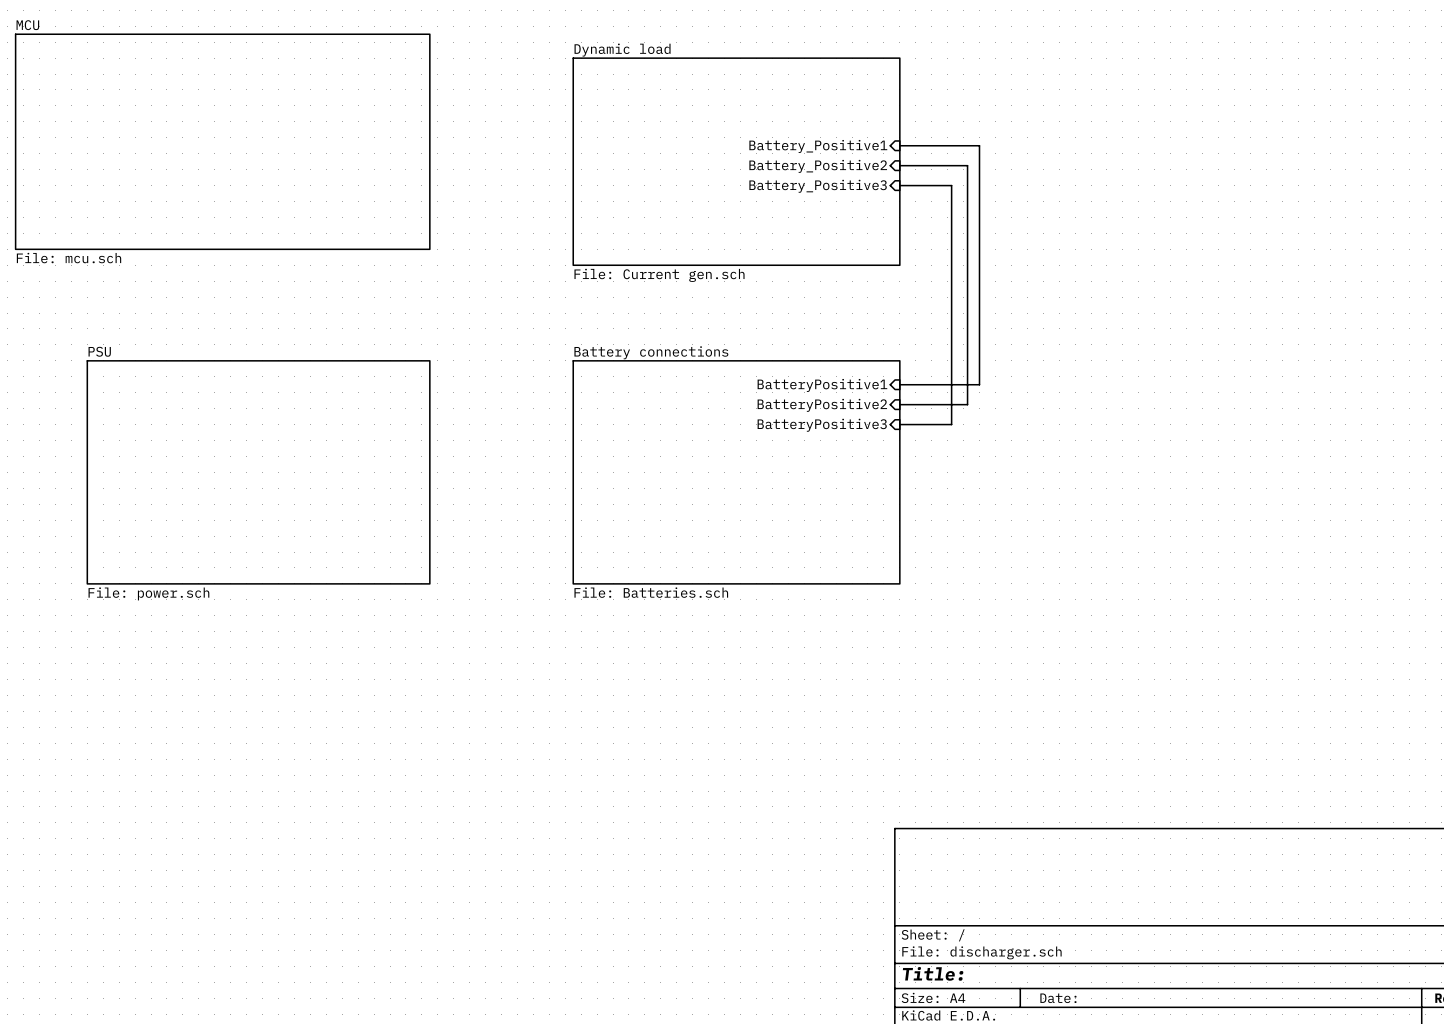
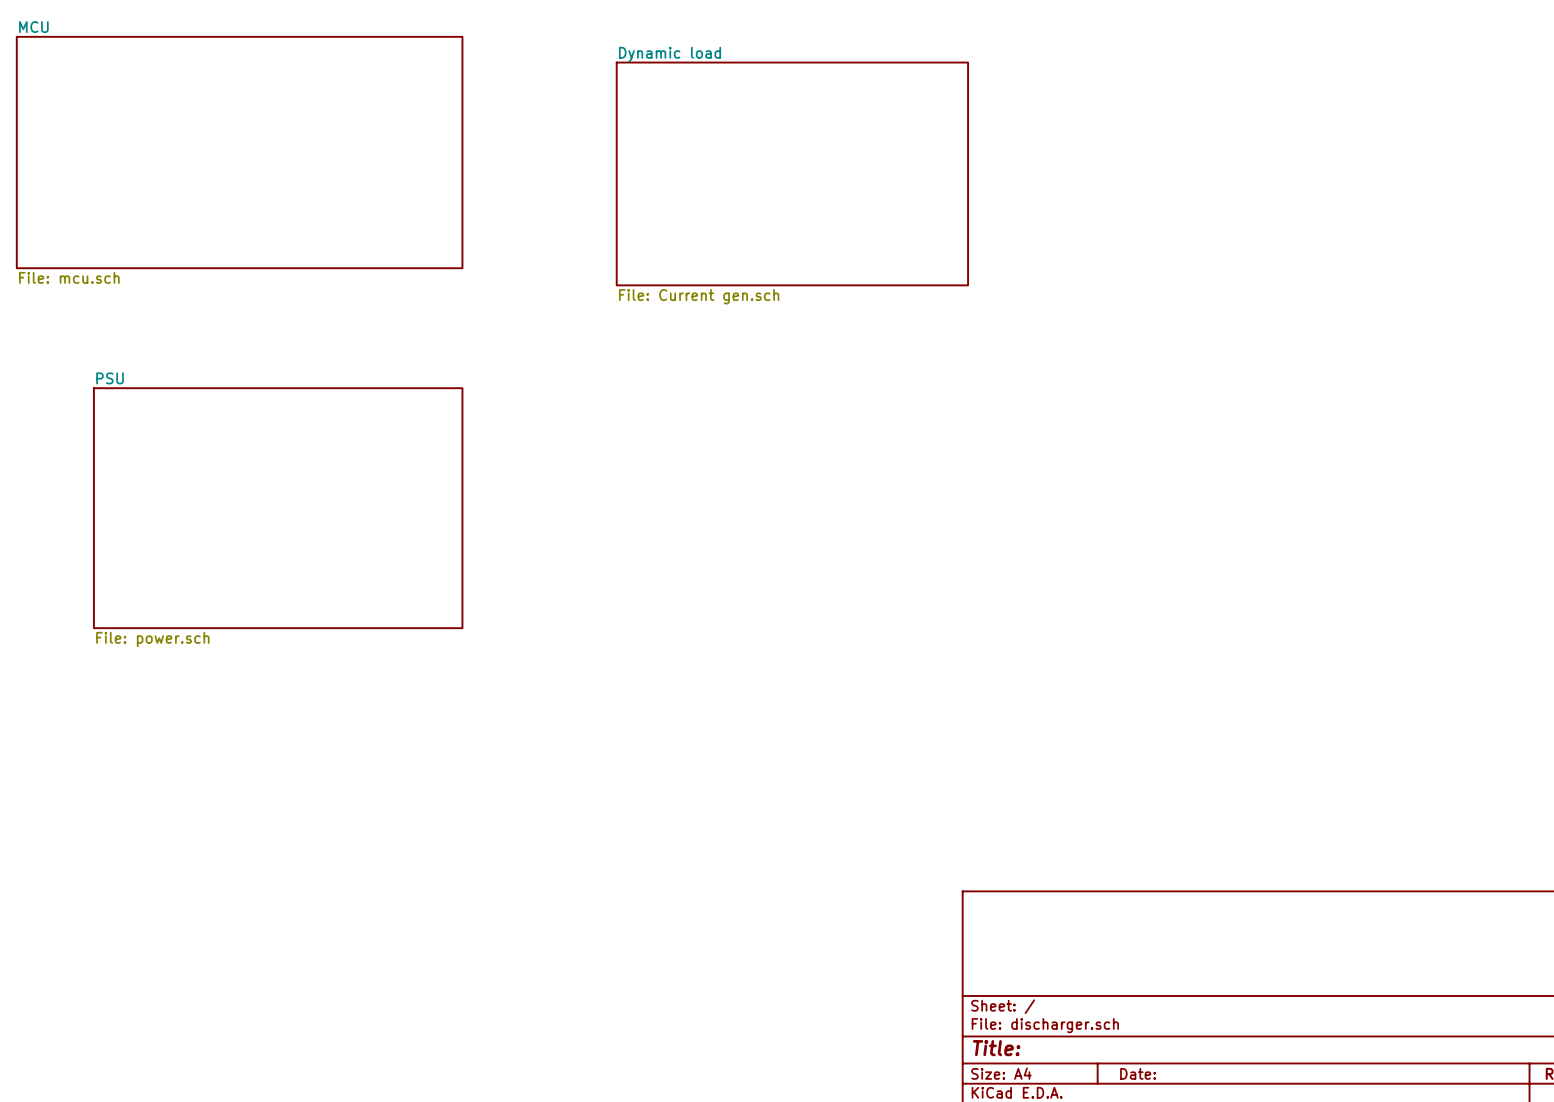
wire: (899, 145) (979, 145) (979, 384) (899, 384) -> none
sheet pin: Battery_Positive1 (818, 146) -> none
wire: (899, 165) (967, 165) (967, 404) (899, 404) -> none
sheet pin: Battery_Positive2 (818, 166) -> none
wire: (899, 185) (951, 185) (951, 424) (899, 424) -> none
sheet pin: Battery_Positive3 (818, 186) -> none
sheet pin: BatteryPositive1 (822, 385) -> none
sheet pin: BatteryPositive2 (822, 405) -> none
sheet pin: BatteryPositive3 (822, 425) -> none
sheet Battery connections: File: Batteries.sch (736, 472) -> none

